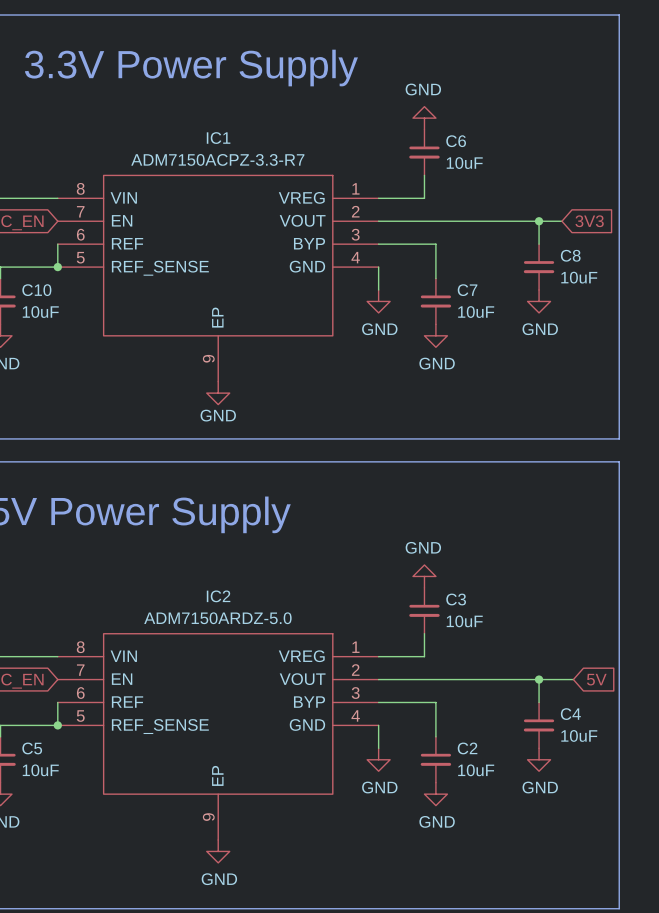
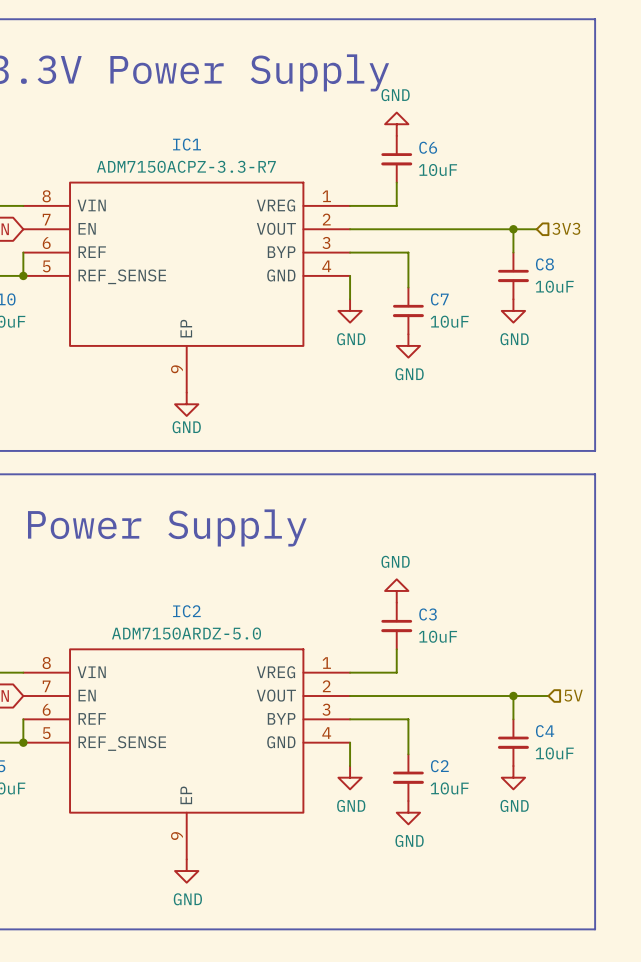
hierarchical label: none -> 3V3 (566, 228)
global label: 3V3 (589, 221) -> none
global label: 5V (596, 679) -> none
hierarchical label: none -> 5V (573, 695)

